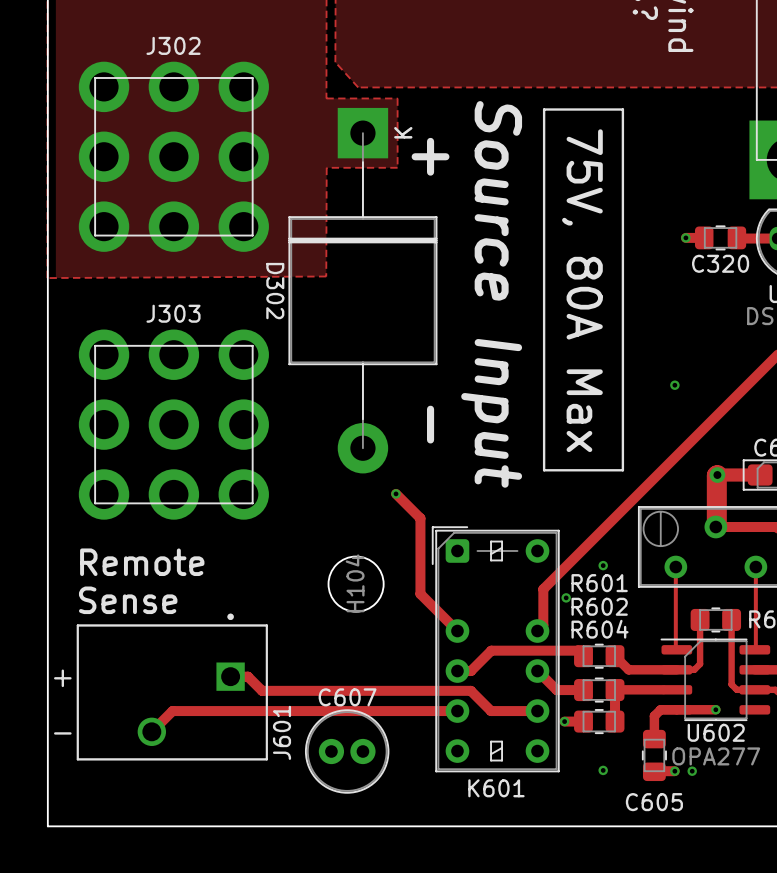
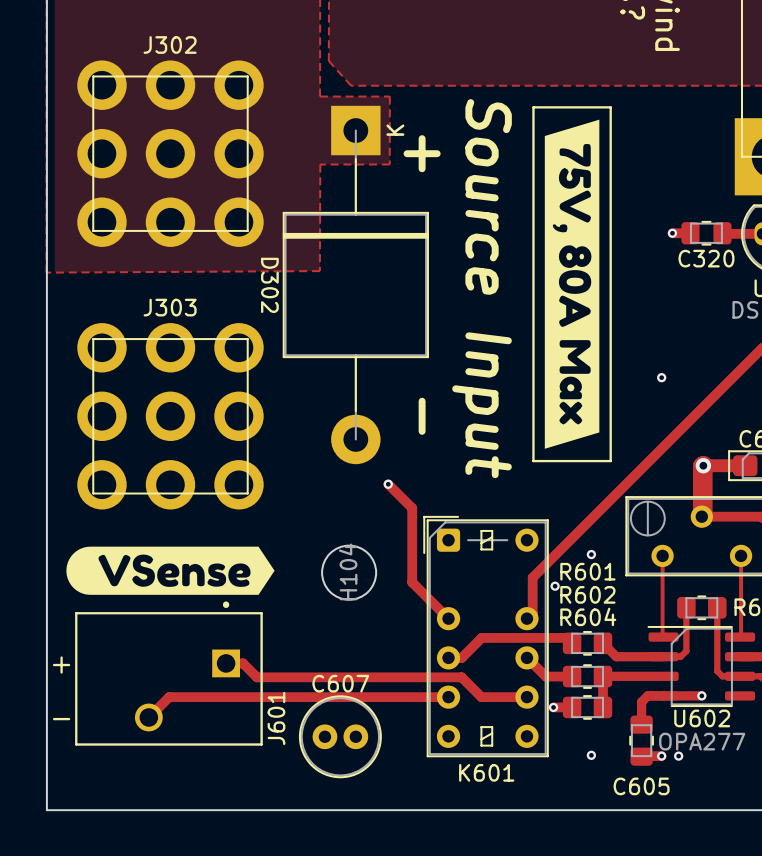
drawing: none -> [544, 119, 600, 449]
text: 75V, 80A Max (582, 290) -> none
drawing: none -> [66, 546, 275, 595]
text: Remote (142, 562) -> none
text: Sense (128, 600) -> none

